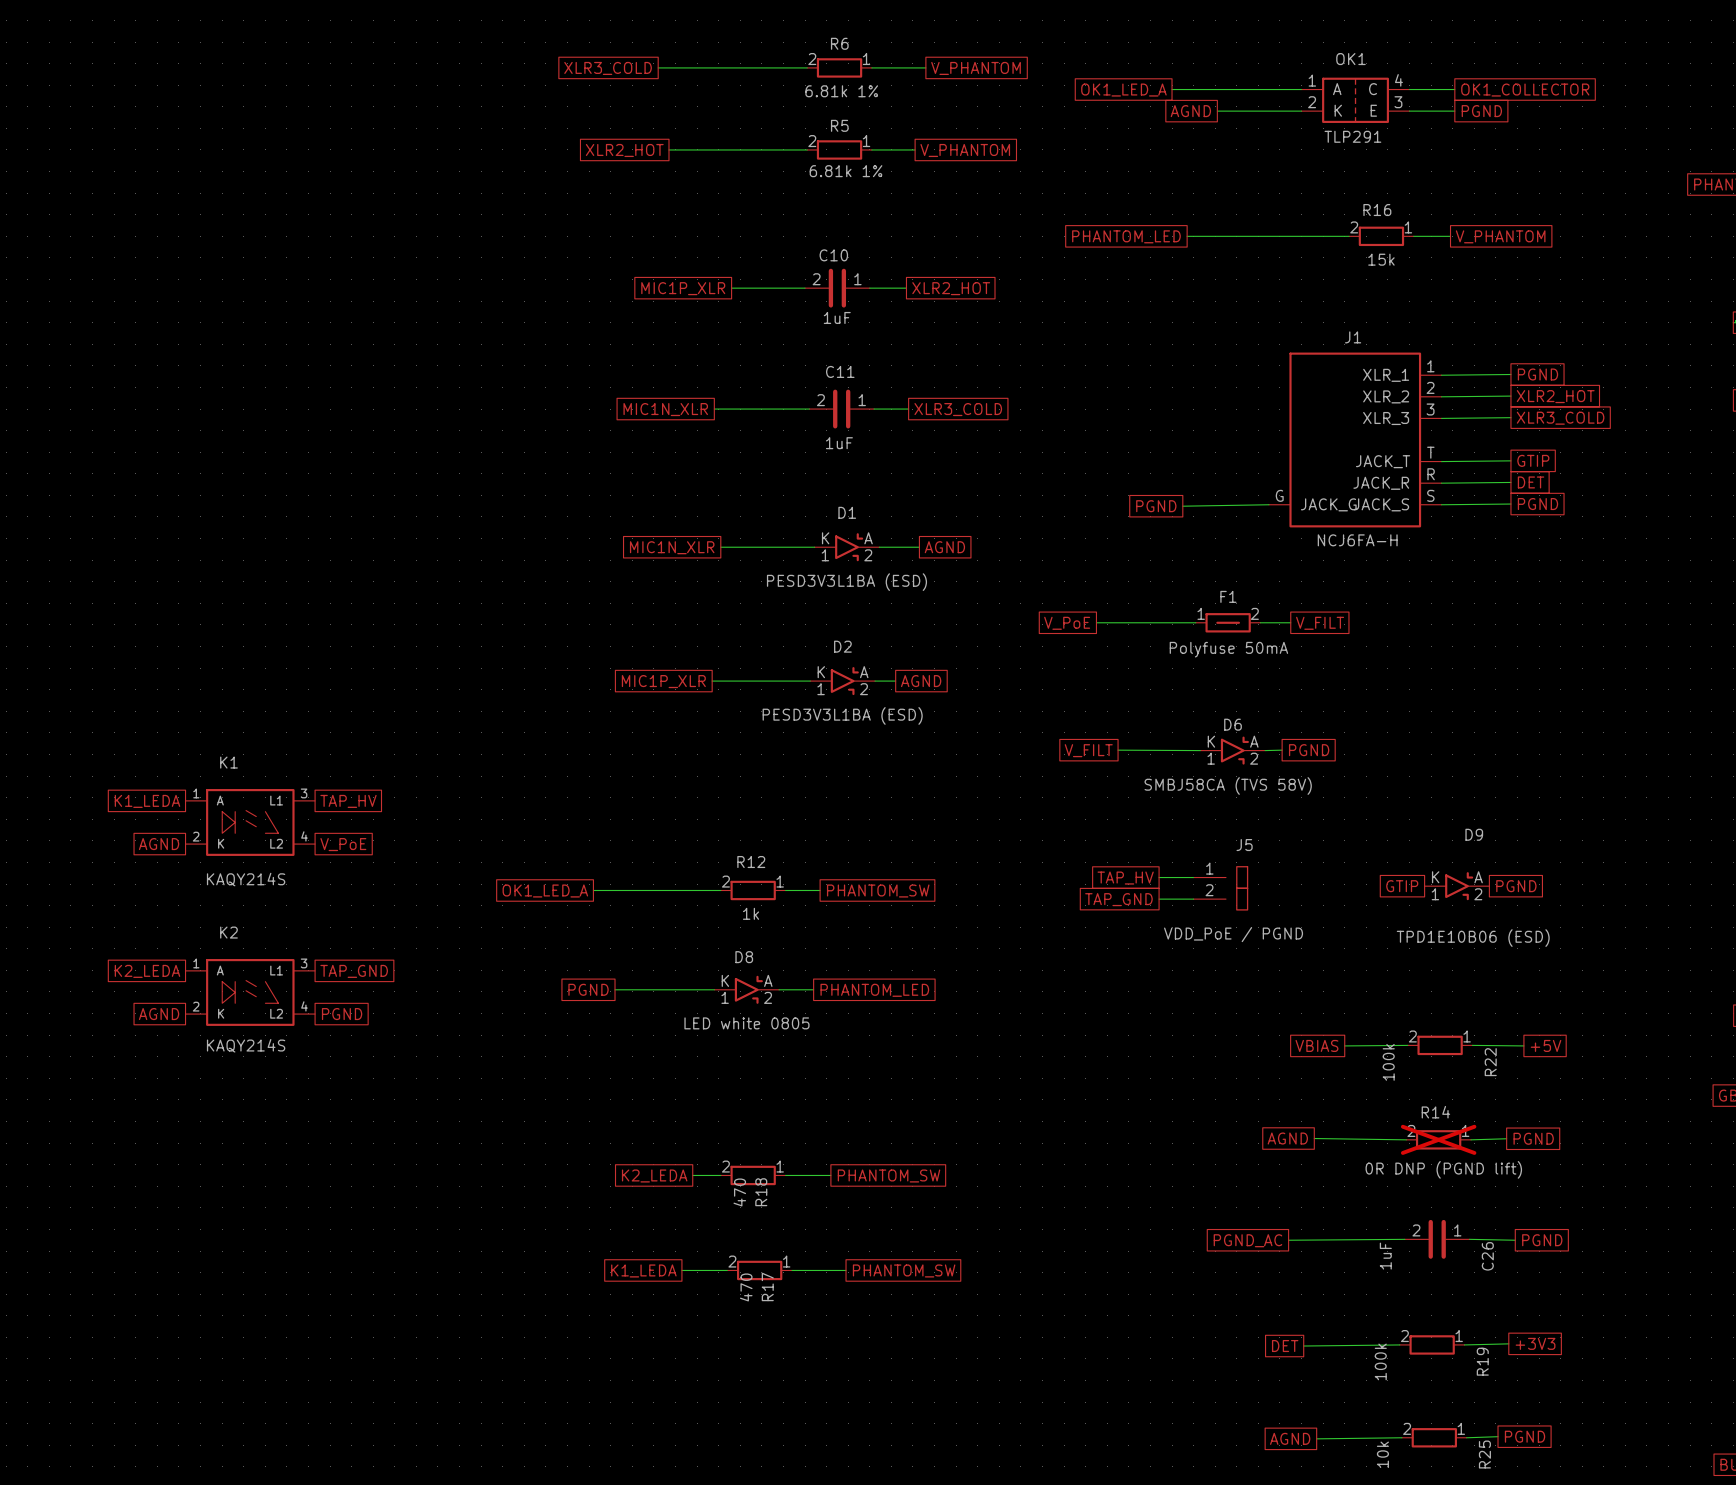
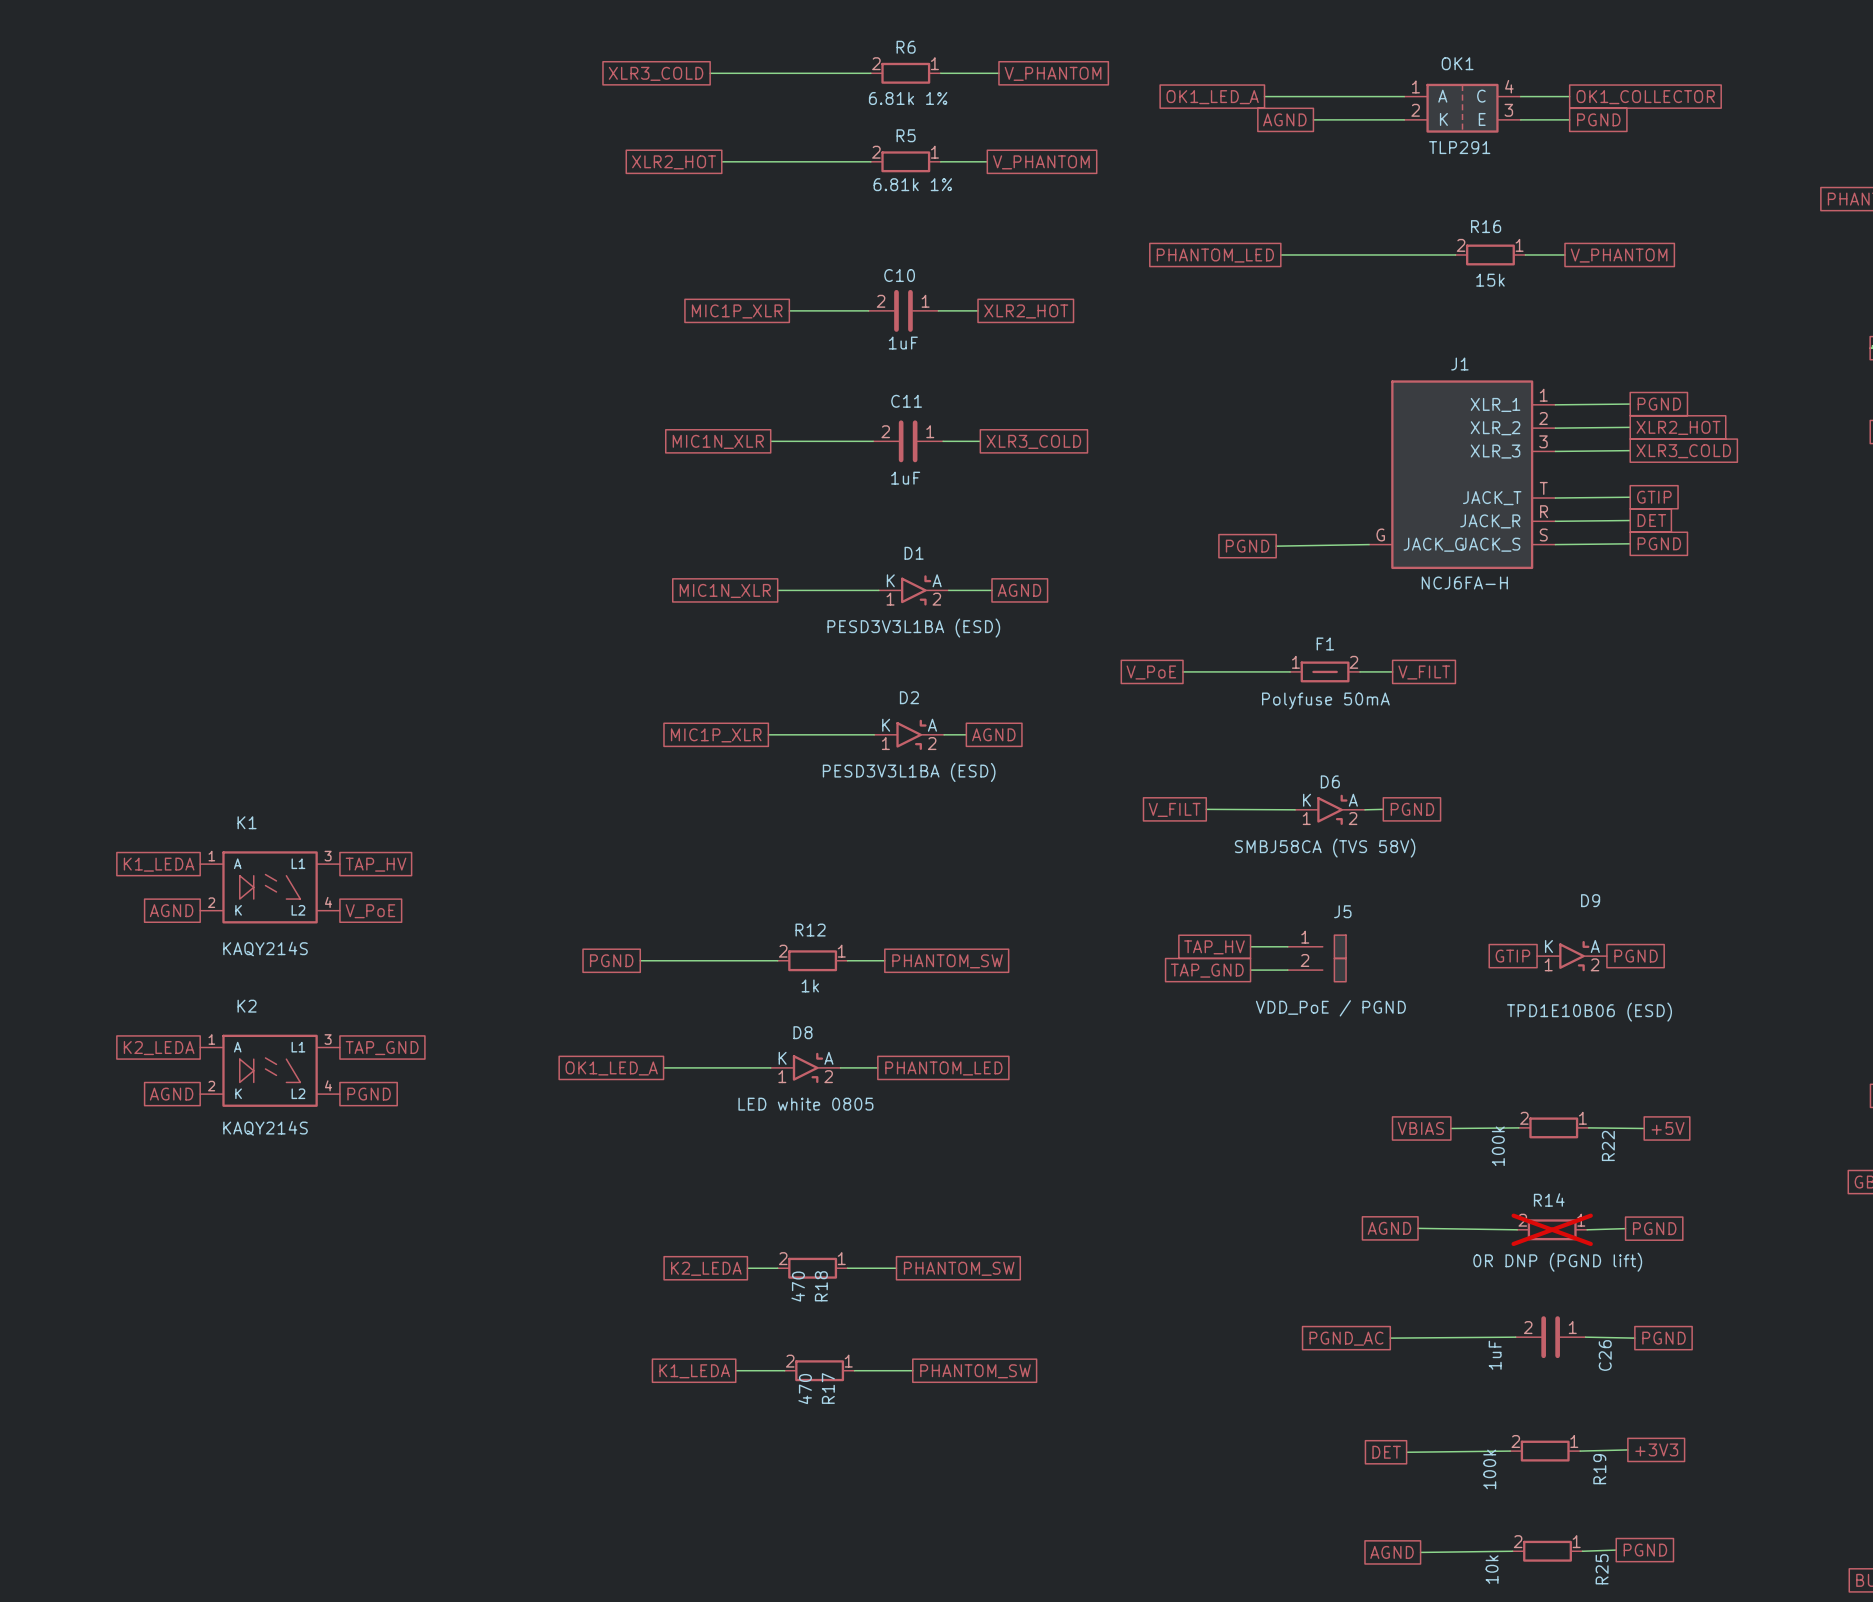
global label: OK1_LED_A (545, 891) -> PGND (611, 960)
global label: PGND (588, 989) -> OK1_LED_A (611, 1068)

